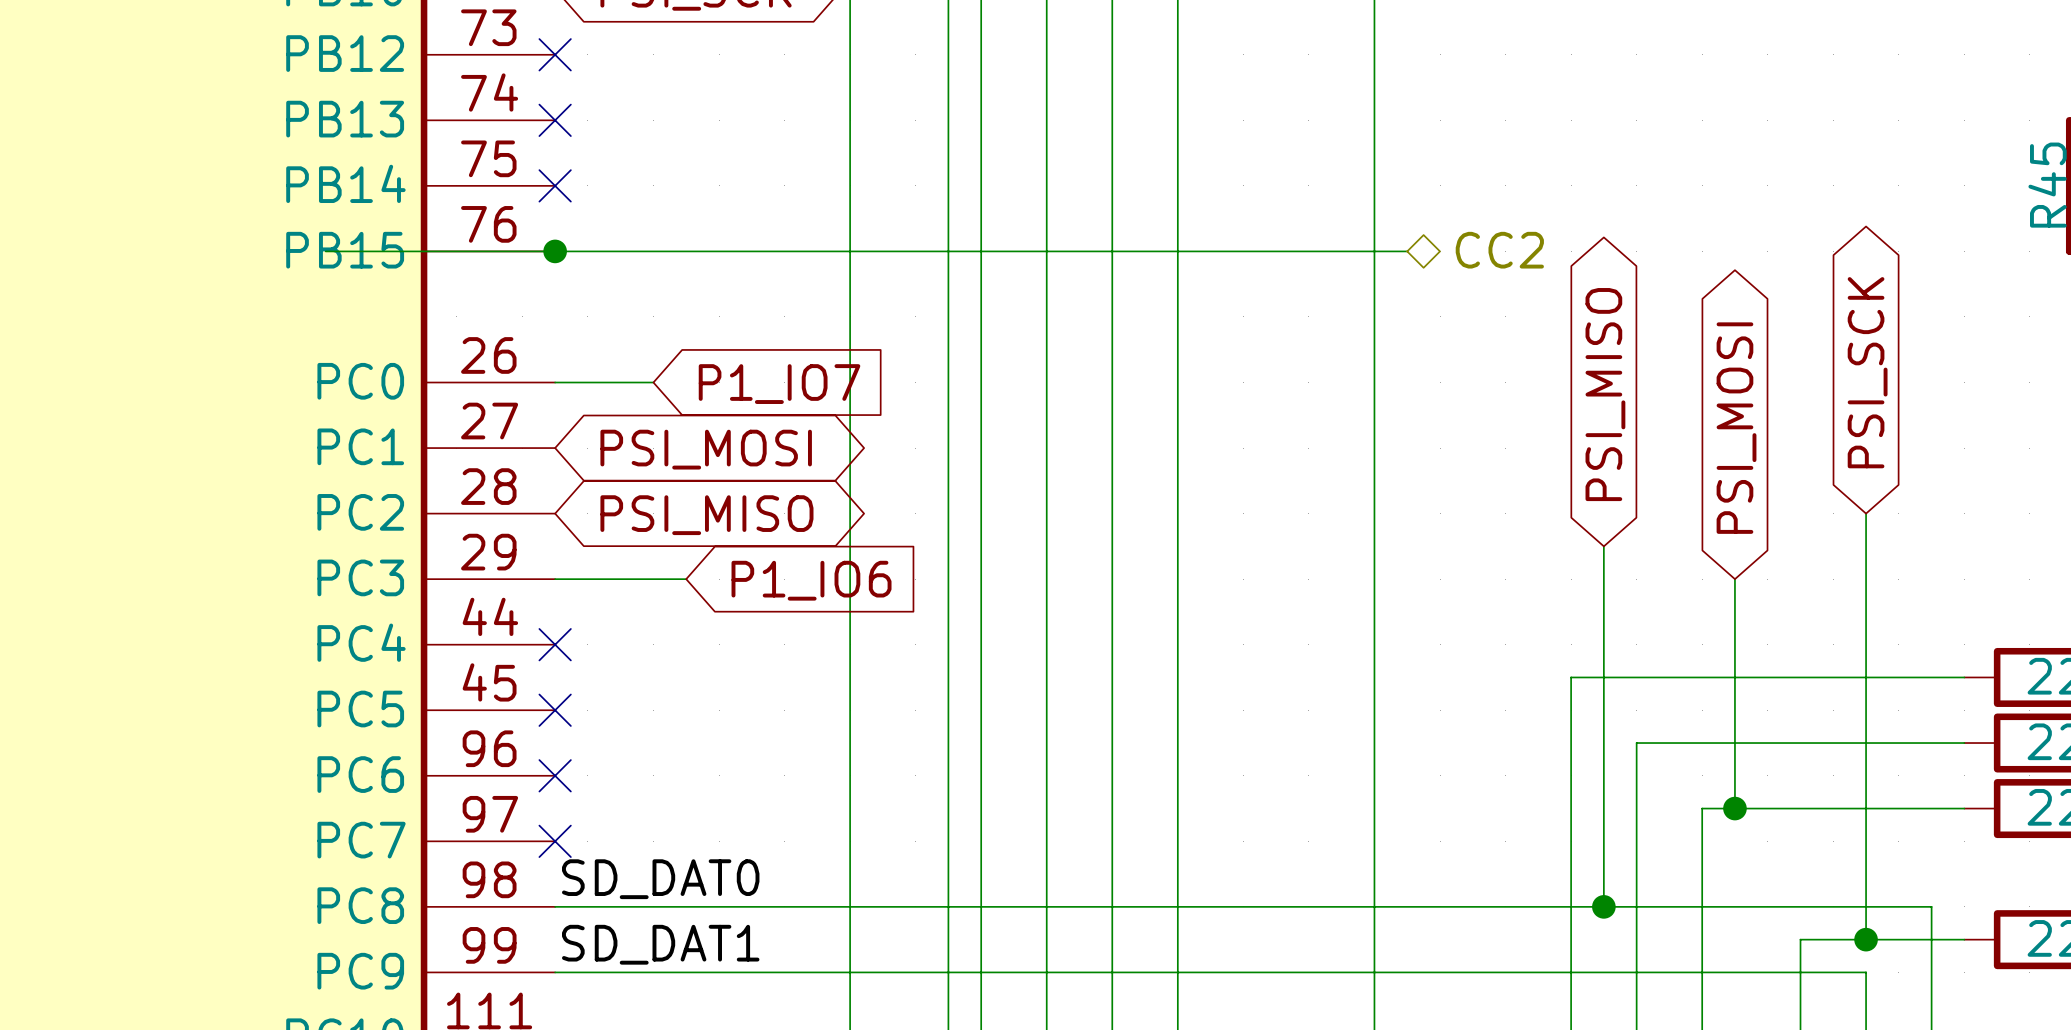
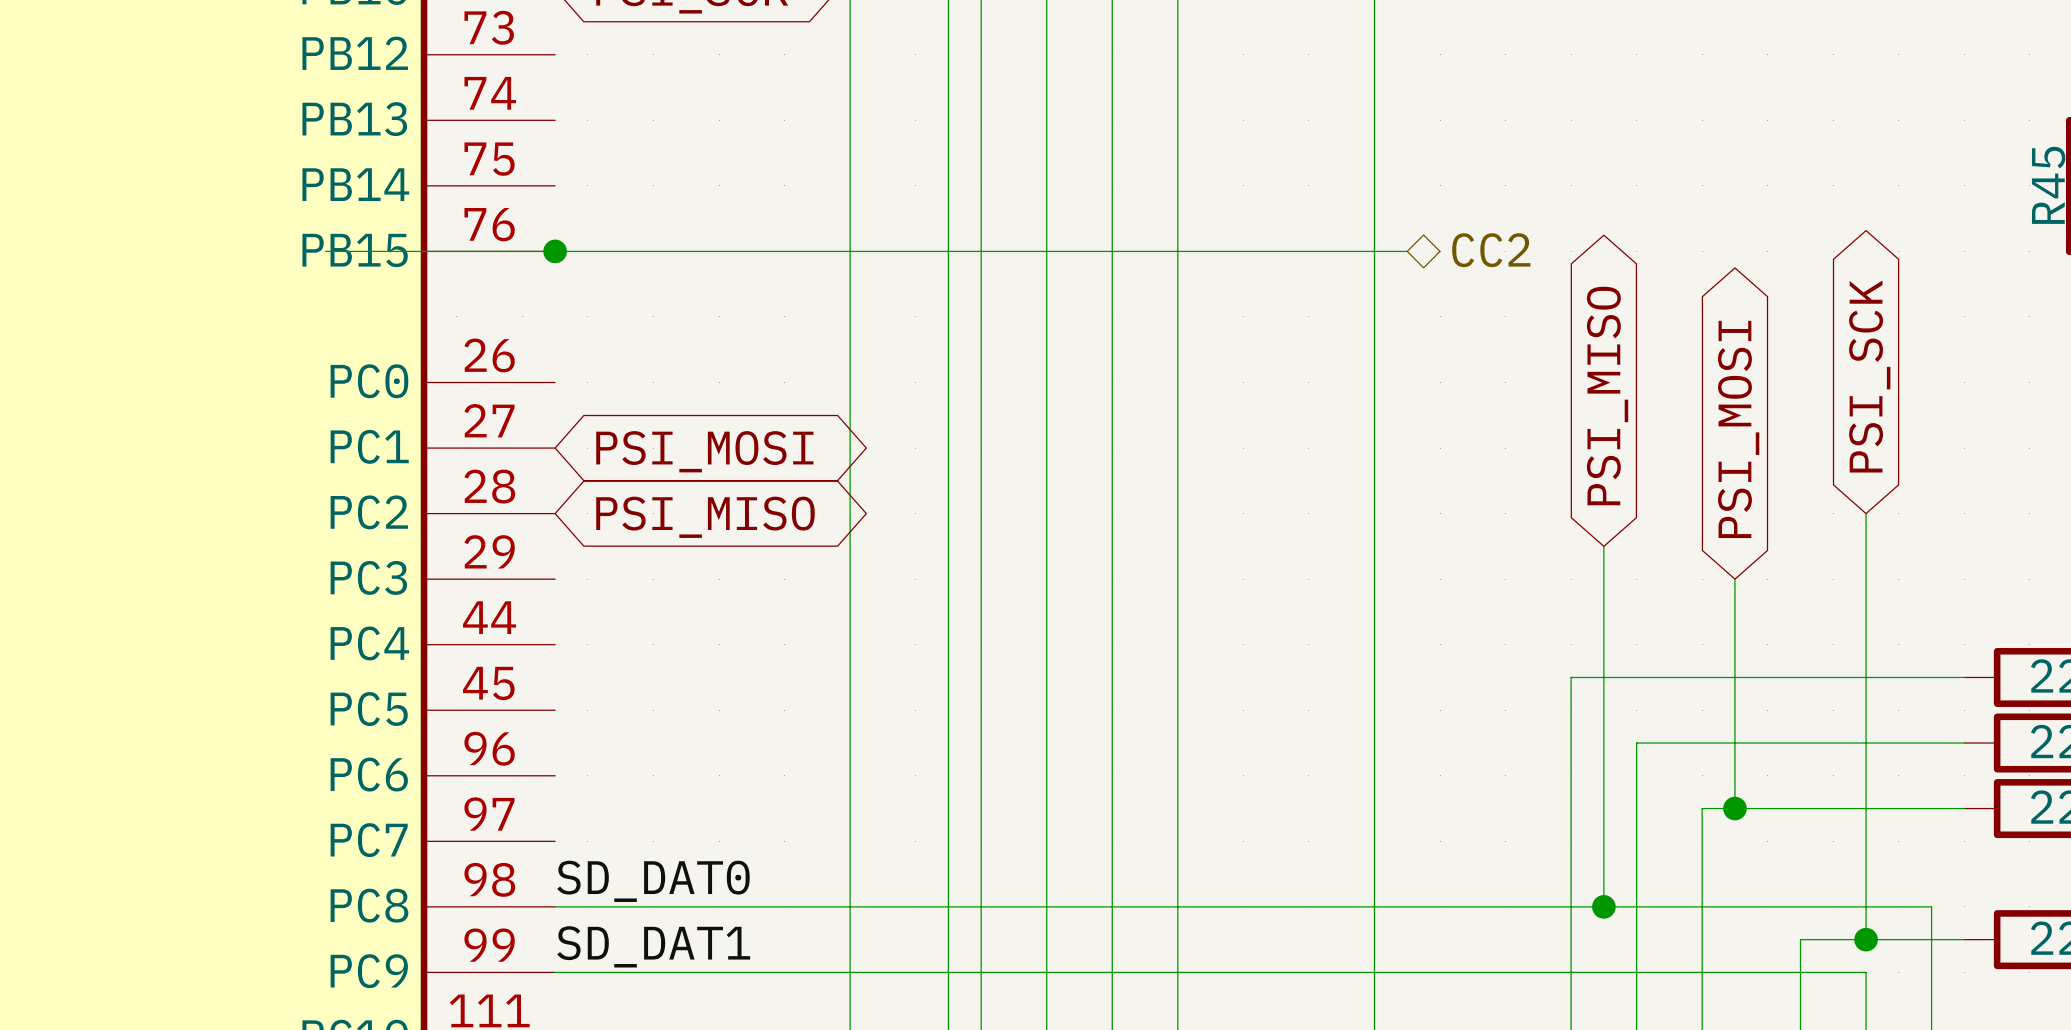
no-connect mark: (555, 54) -> none
no-connect mark: (555, 120) -> none
no-connect mark: (555, 185) -> none
wire: (555, 382) (653, 382) -> none
global label: P1_IO7 (779, 384) -> none
wire: (555, 579) (686, 579) -> none
global label: P1_IO6 (811, 580) -> none
no-connect mark: (555, 644) -> none
no-connect mark: (555, 710) -> none
no-connect mark: (555, 775) -> none
no-connect mark: (555, 841) -> none

